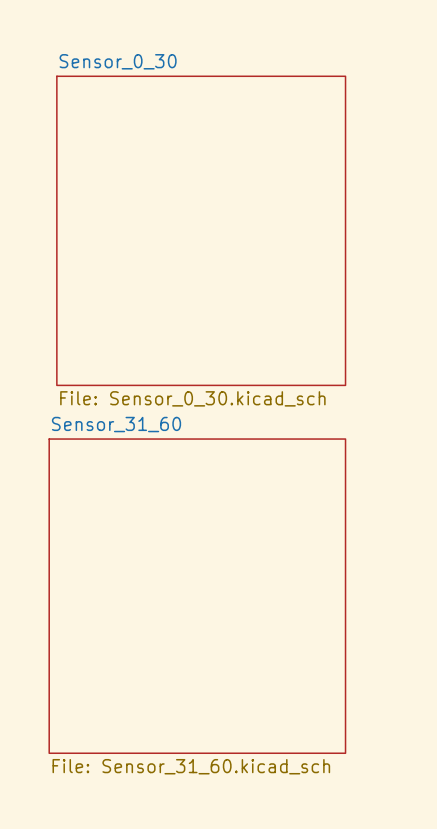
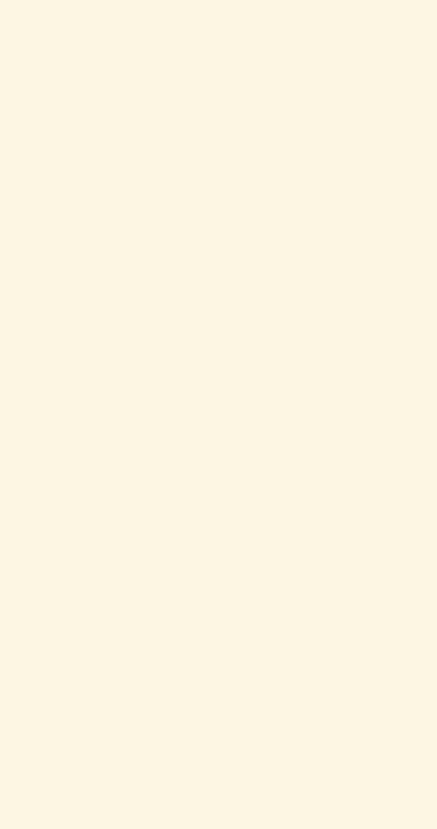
sheet Sensor_0_30: File: Sensor_0_30.kicad_sch (201, 230) -> none
sheet Sensor_31_60: File: Sensor_31_60.kicad_sch (197, 596) -> none

